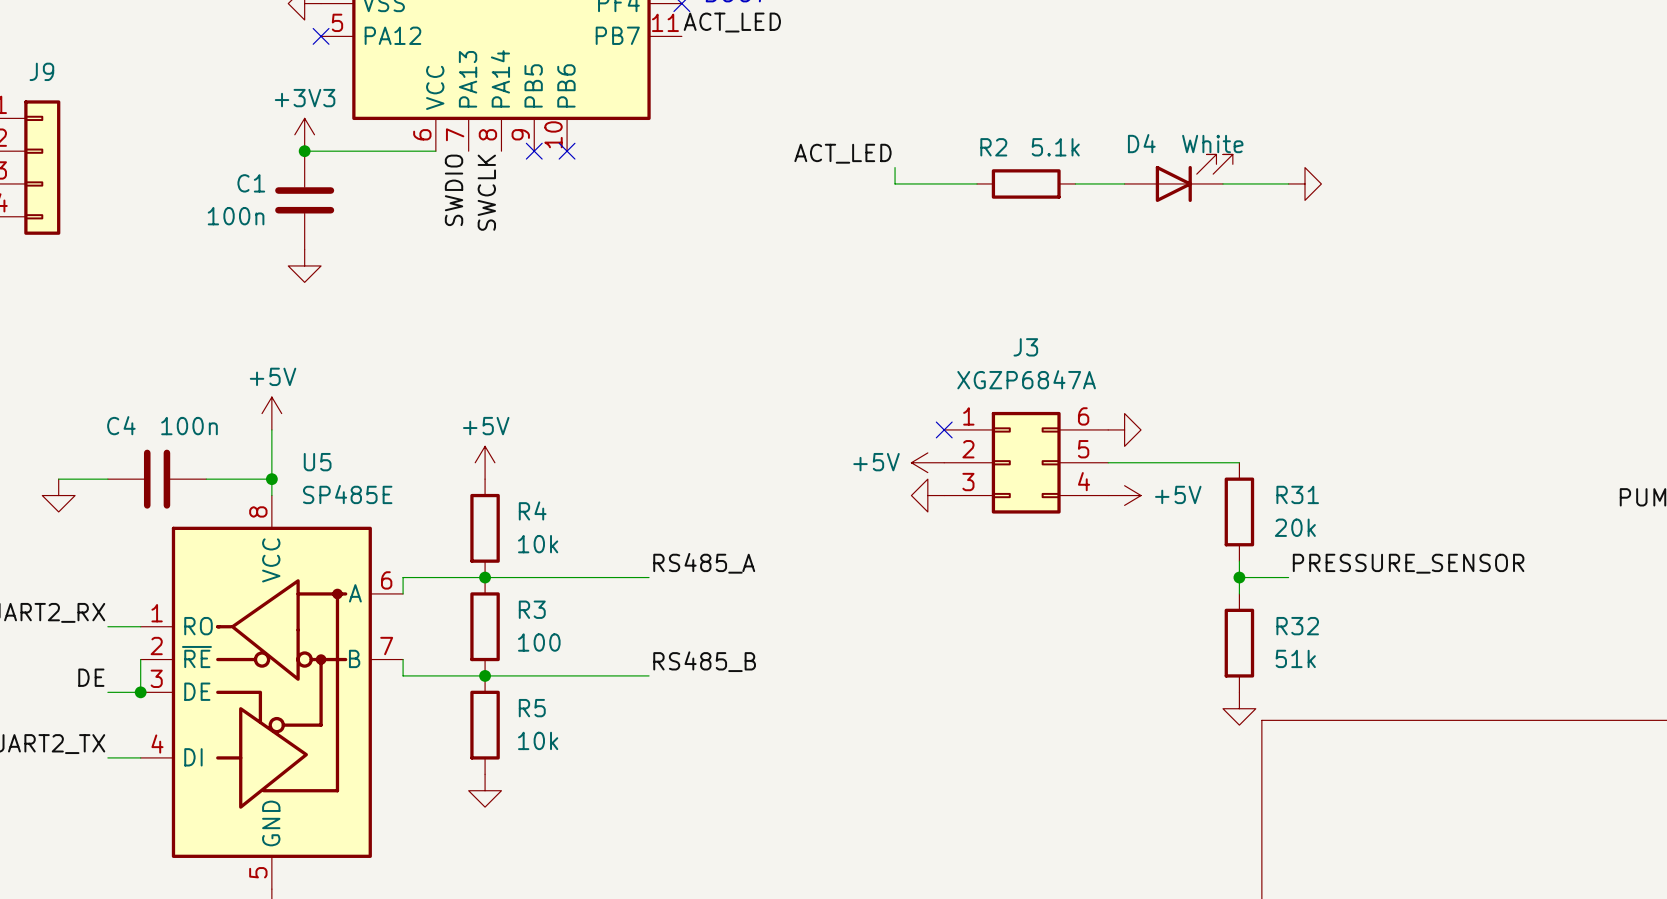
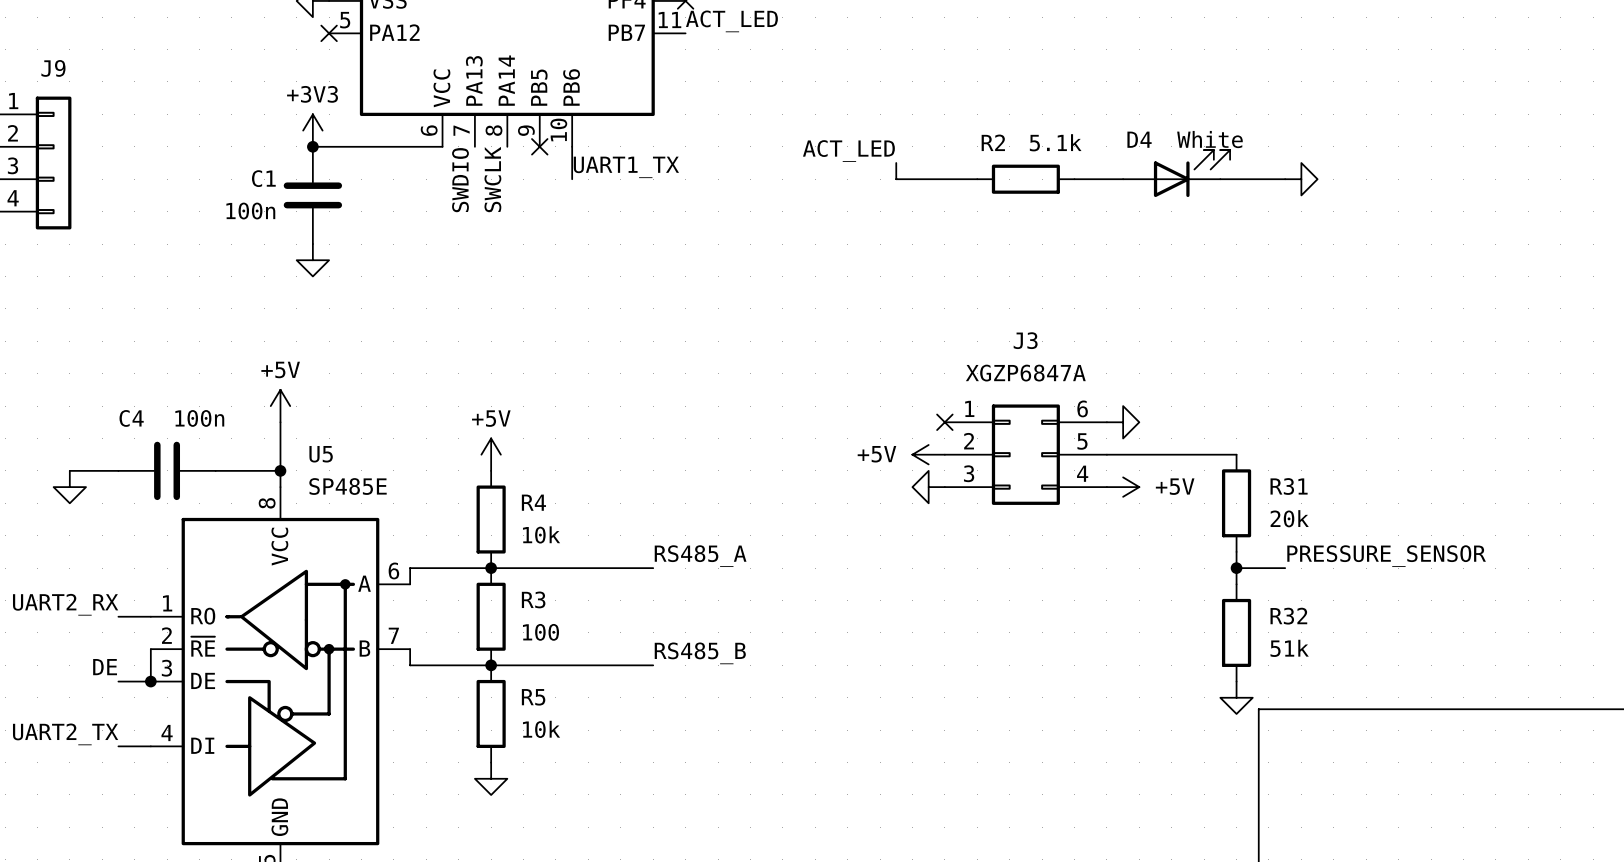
wire: none -> (572, 146) (572, 179)
no-connect mark: (567, 151) -> none
label: none -> UART1_TX (626, 167)

